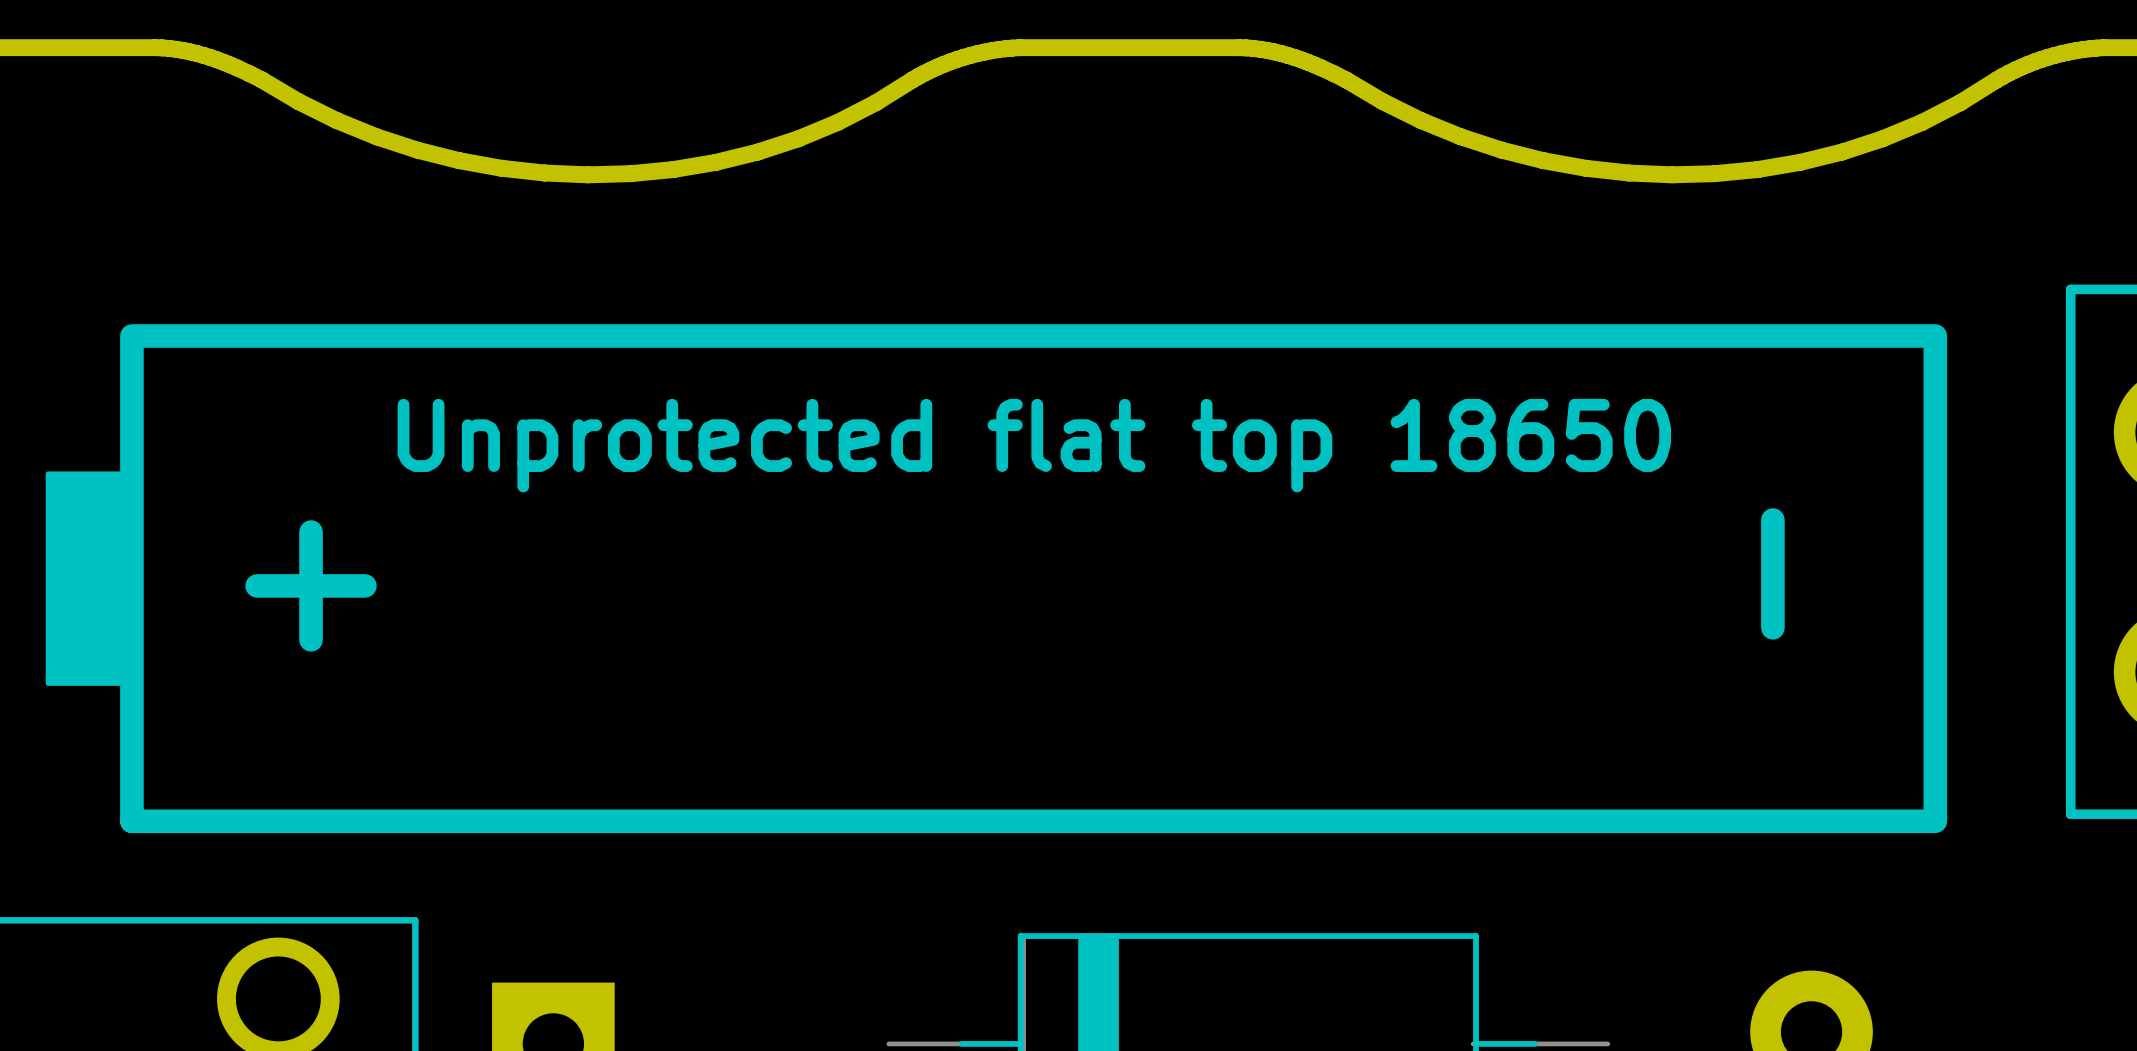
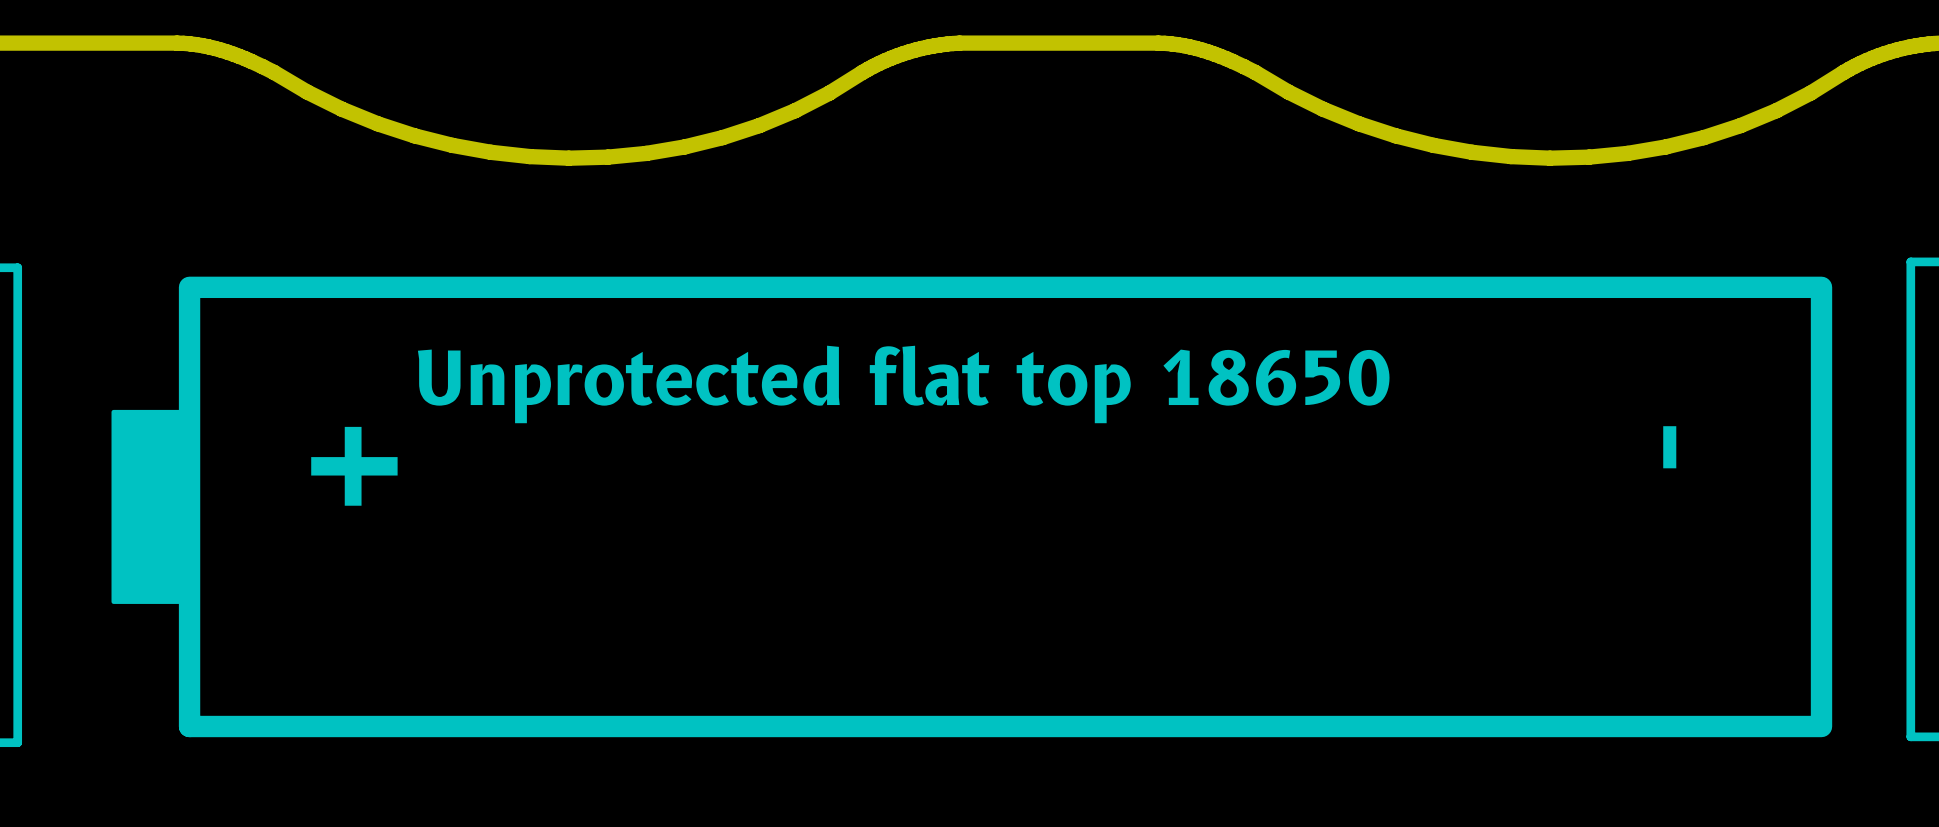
drawing position: (996, 578) -> (971, 506)

